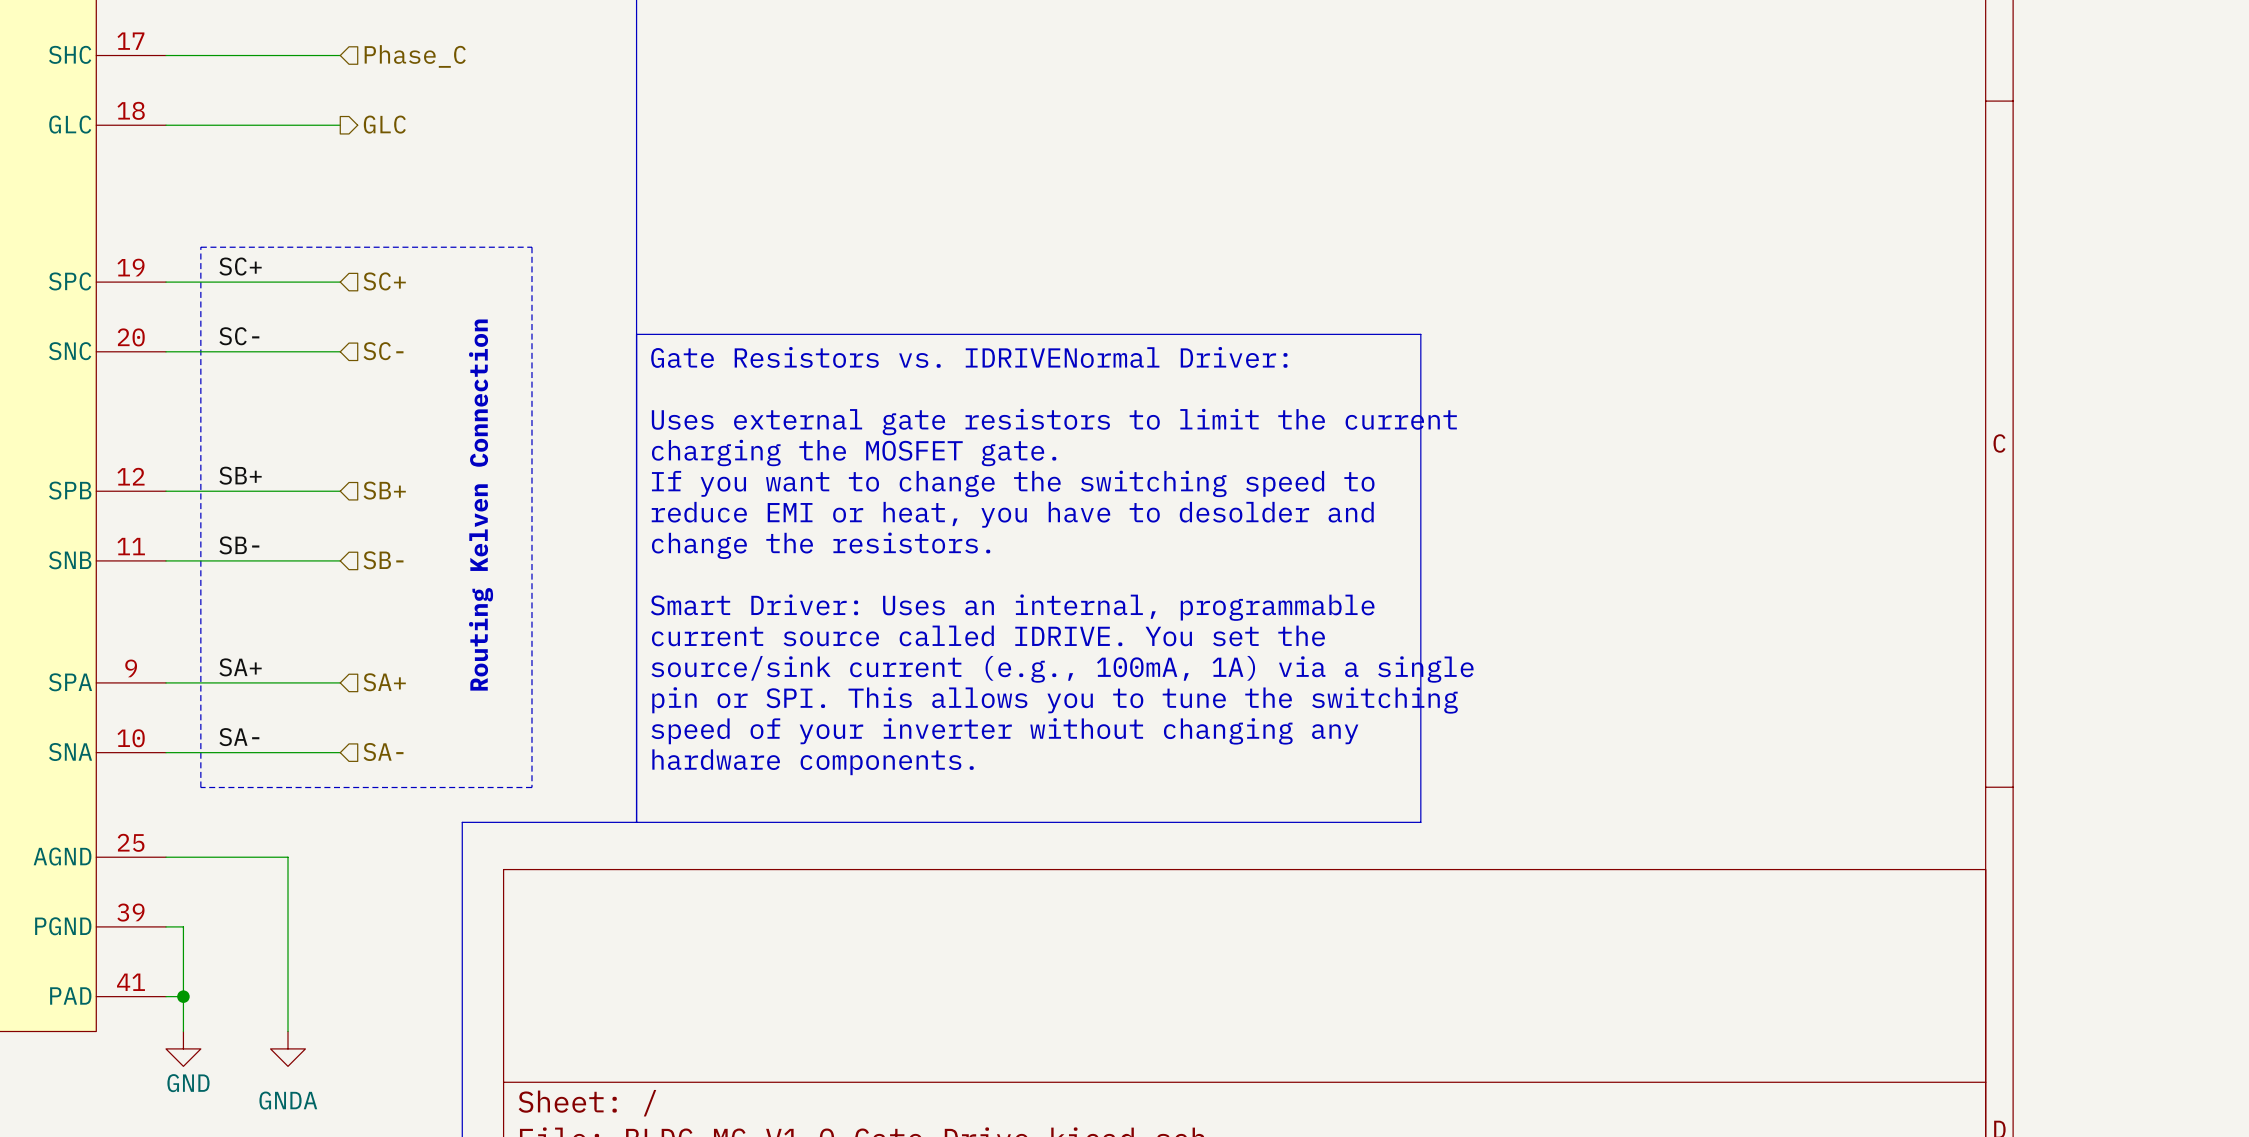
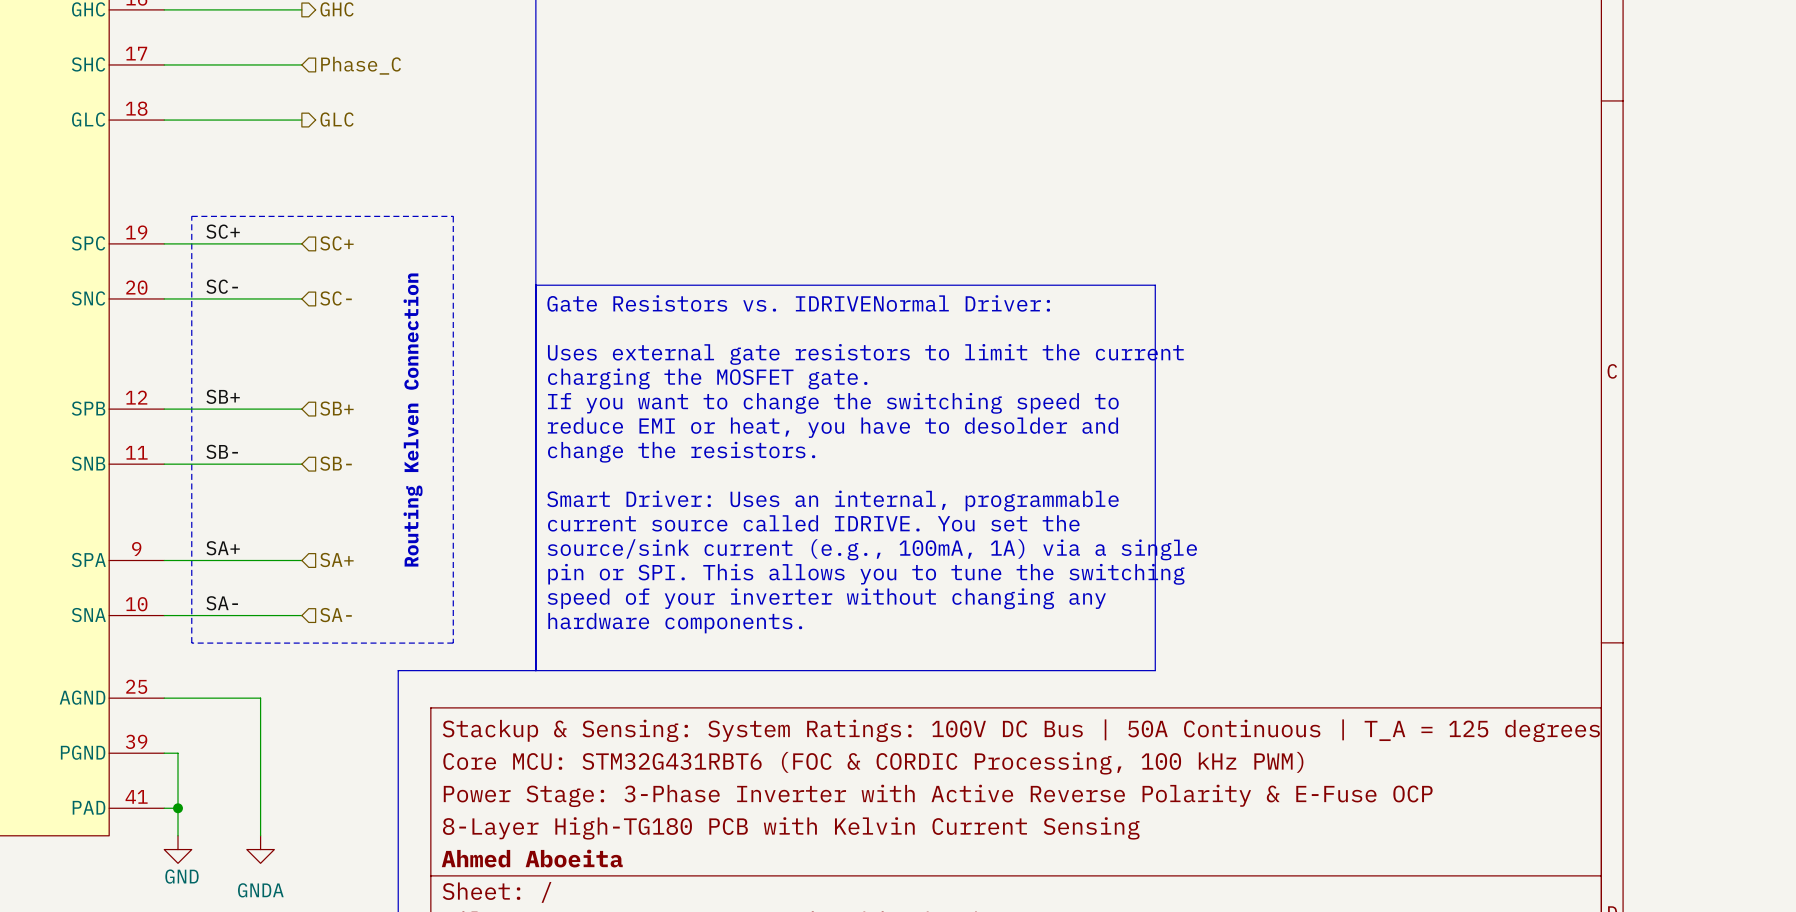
title block: none -> Stackup & Sensing: System Ratings: 100V DC Bus | 50A Continuous | T_A = 125 degrees (1021, 730)
title block: none -> Core MCU: STM32G431RBT6 (FOC & CORDIC Processing, 100 kHz PWM) (873, 763)
title block: none -> Power Stage: 3-Phase Inverter with Active Reverse Polarity & E-Fuse OCP (938, 795)
title block: none -> 8-Layer High-TG180 PCB with Kelvin Current Sensing (791, 828)
title block: none -> Ahmed Aboeita (532, 858)

